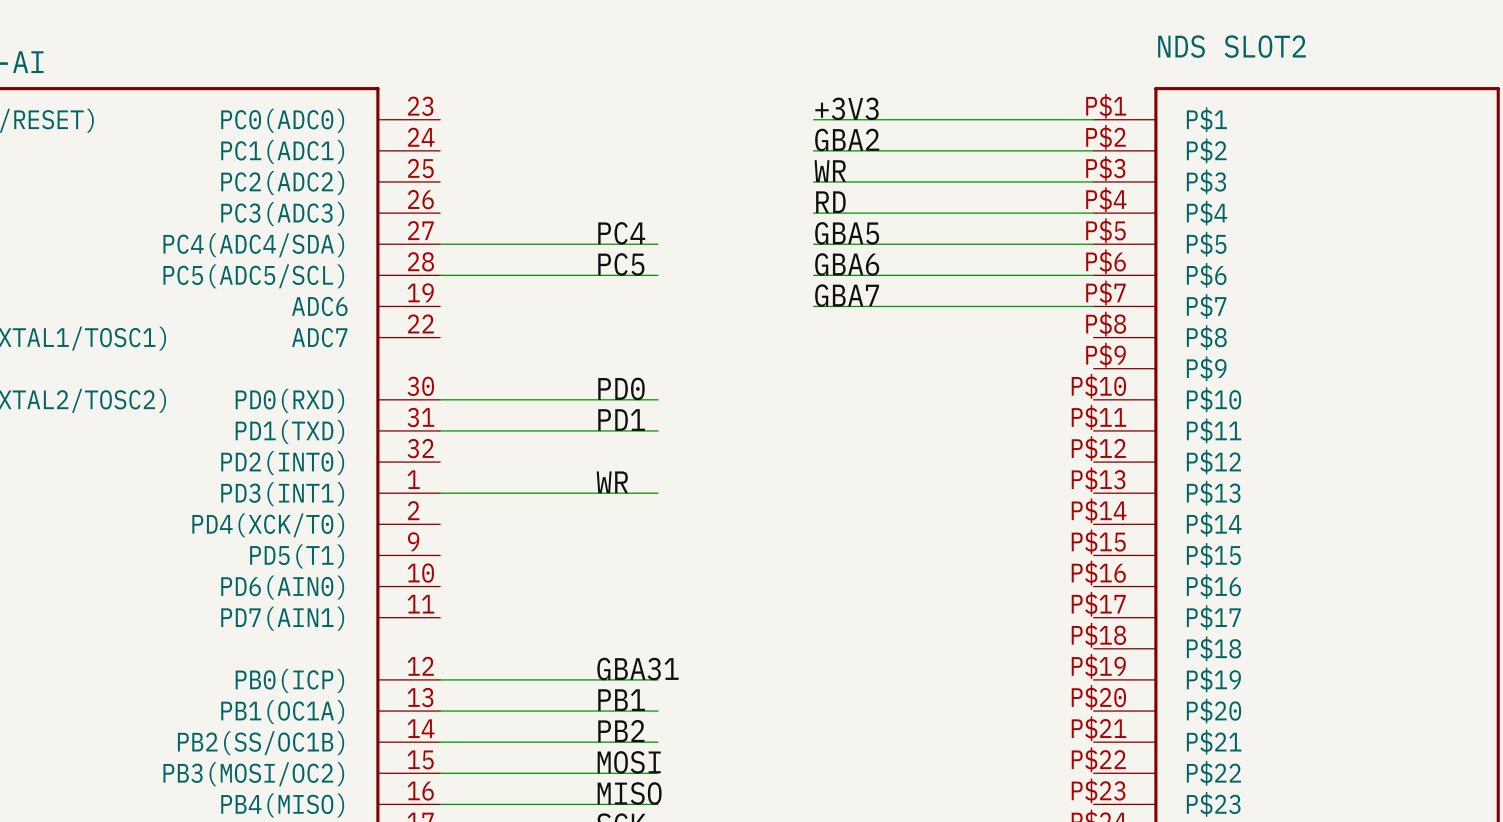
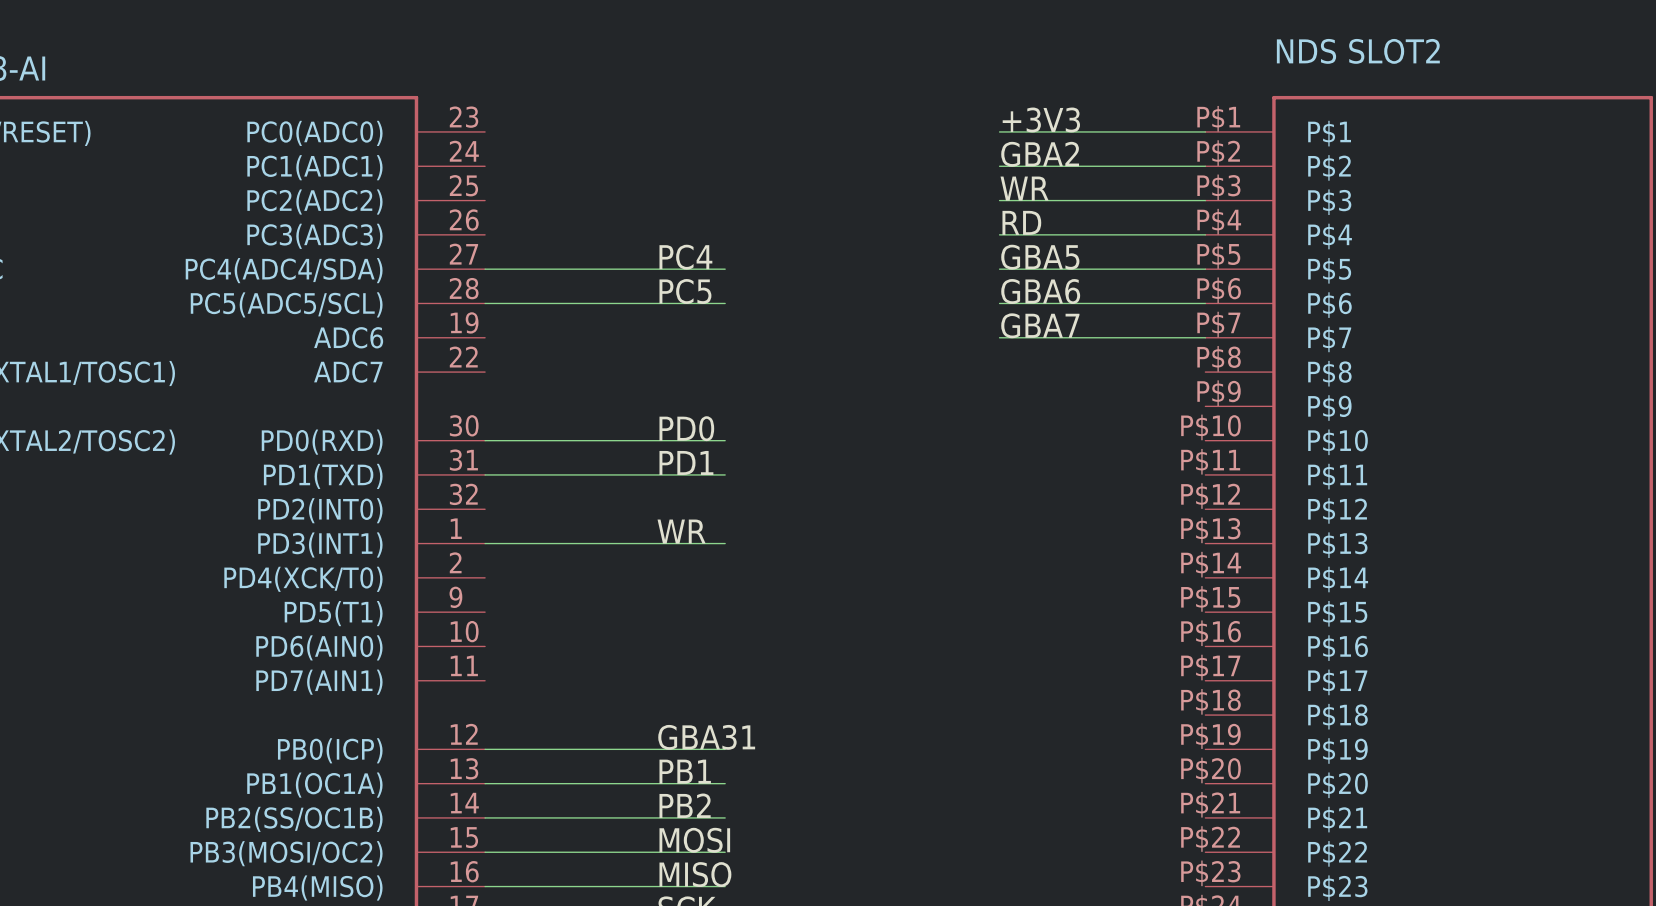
label position: +3V3 (847, 108) -> +3V3 (1041, 119)
wire: (813, 119) (906, 119) -> none
label position: GBA2 (847, 139) -> GBA2 (1040, 154)
wire: (813, 150) (906, 150) -> none
label position: WR (830, 171) -> WR (1024, 188)
wire: (813, 181) (906, 181) -> none
label position: RD (830, 202) -> RD (1021, 222)
wire: (813, 213) (906, 213) -> none
label position: GBA5 (847, 233) -> GBA5 (1040, 257)
wire: (813, 244) (906, 244) -> none
label position: GBA6 (847, 264) -> GBA6 (1040, 291)
wire: (813, 275) (906, 275) -> none
label position: GBA7 (847, 295) -> GBA7 (1040, 325)
wire: (813, 306) (906, 306) -> none

